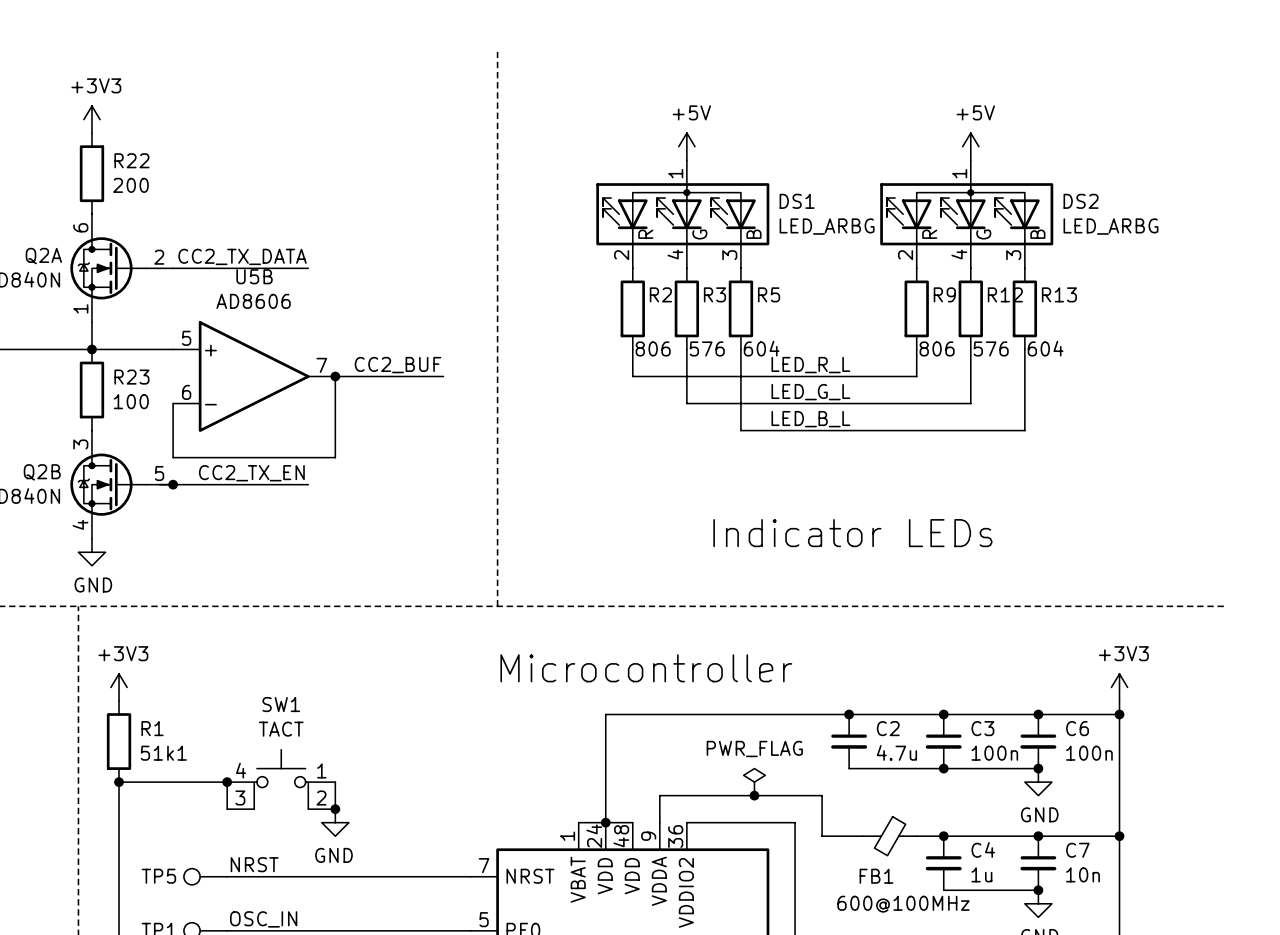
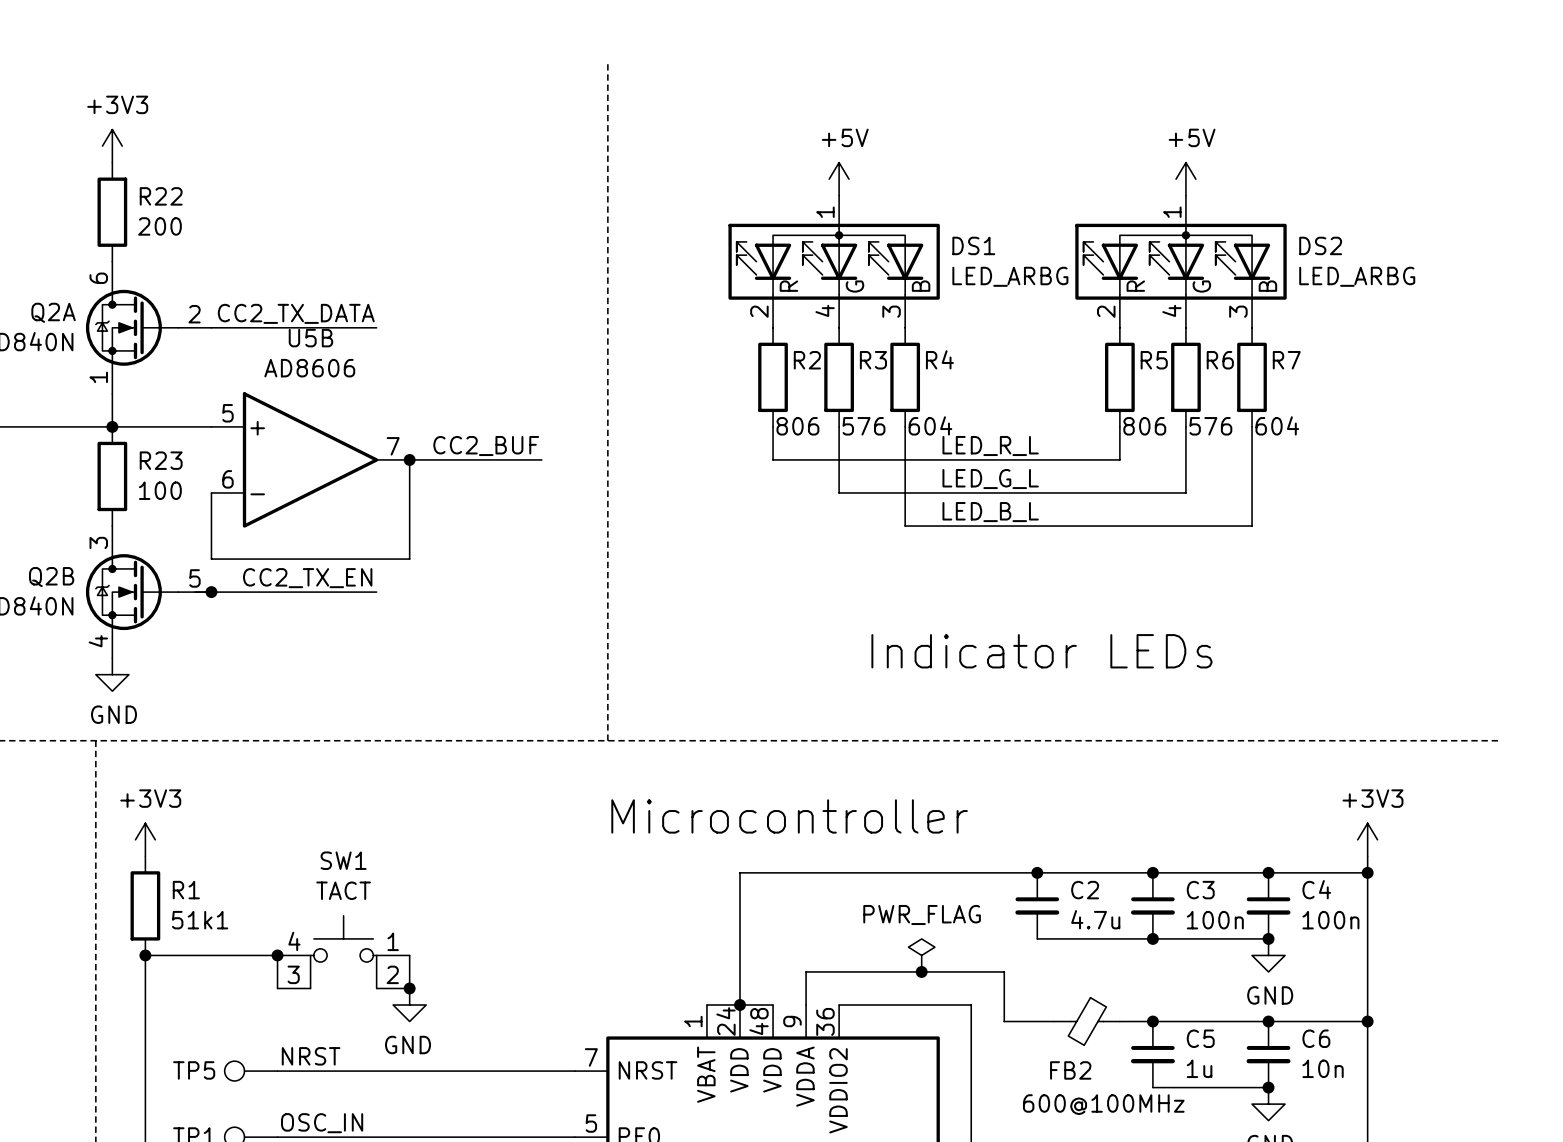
R5 name: R5 (769, 294) -> R4 (939, 359)
R9 name: R9 (944, 294) -> R5 (1154, 360)
R12 name: R12 (1005, 294) -> R6 (1220, 360)
R13 name: R13 (1059, 294) -> R7 (1286, 360)
C6 name: C6 (1077, 728) -> C4 (1316, 889)
C4 name: C4 (983, 849) -> C5 (1200, 1038)
C7 name: C7 (1077, 850) -> C6 (1316, 1038)
FB1 name: FB1 (876, 876) -> FB2 (1070, 1070)

